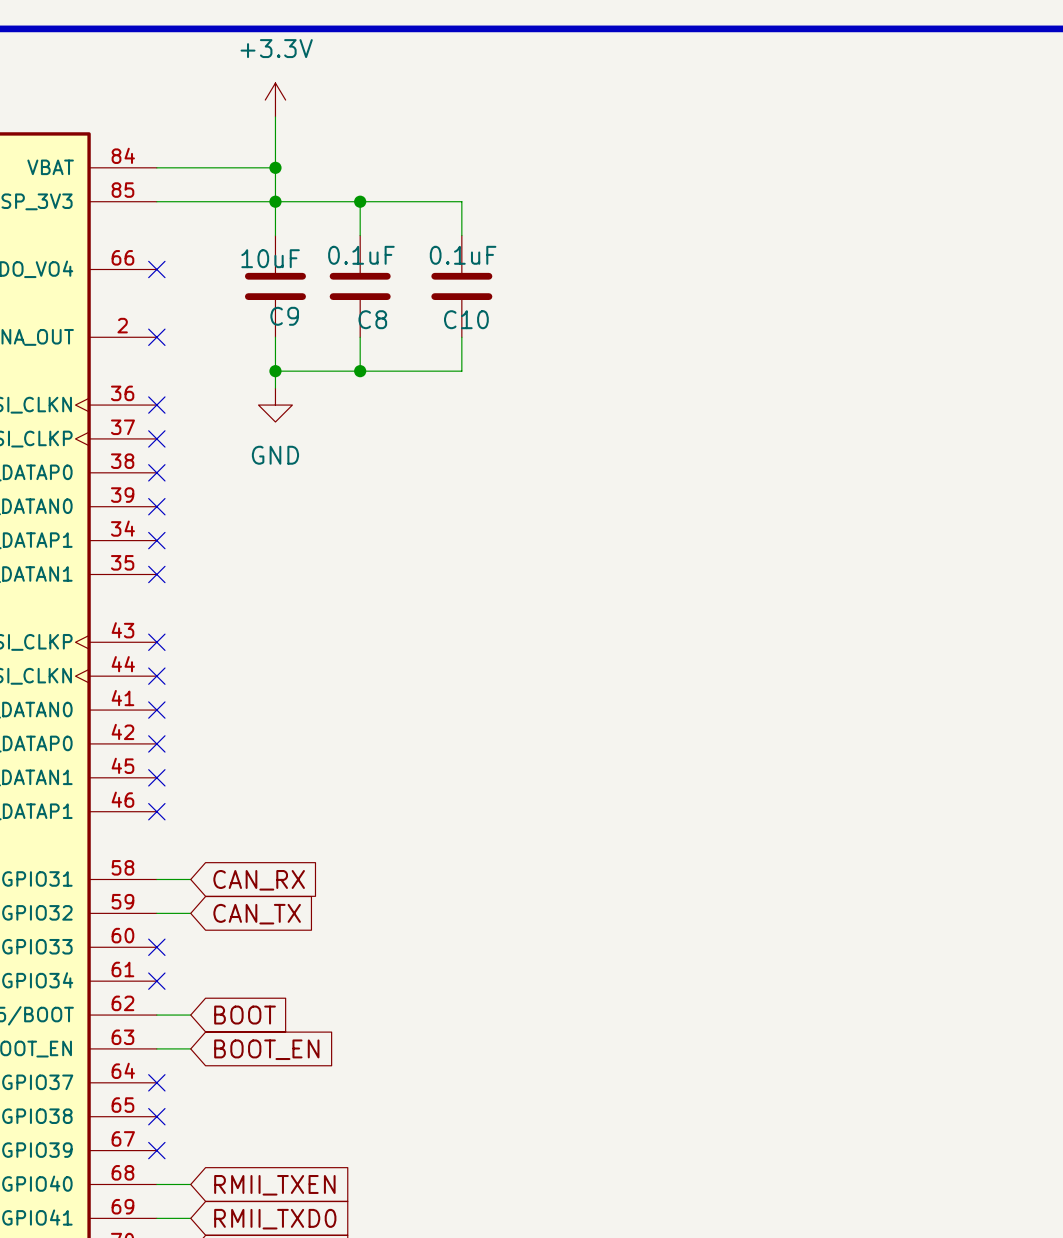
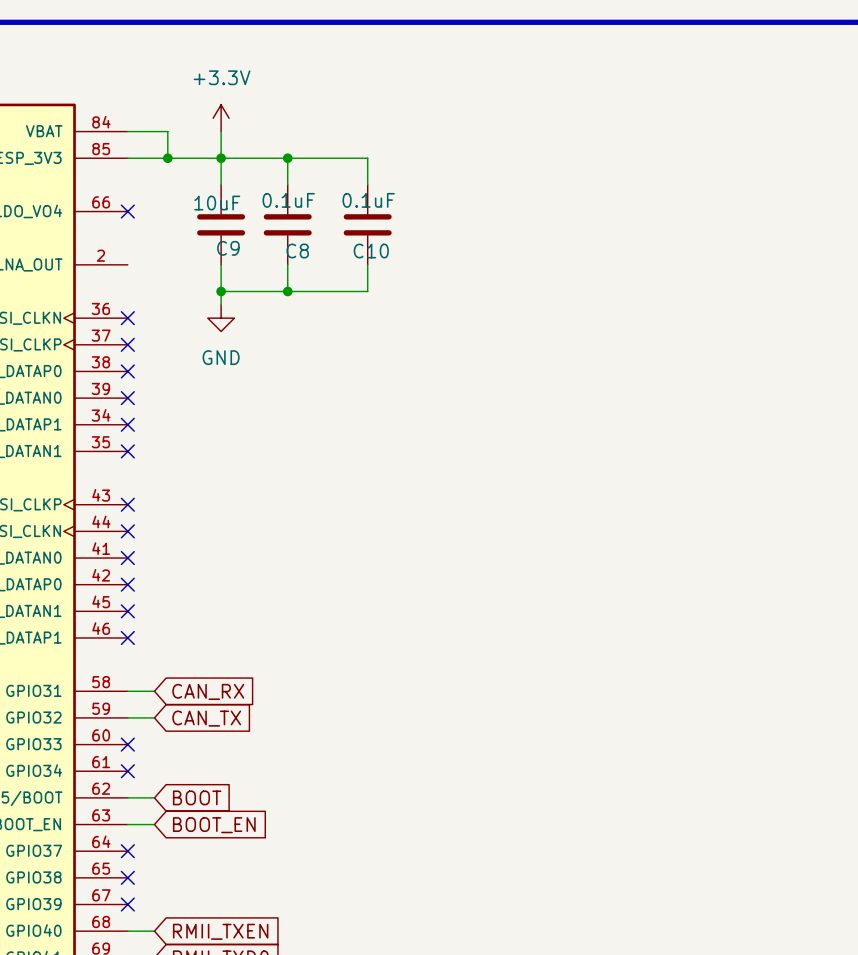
power symbol position: +3.3V (275, 100) -> +3.3V (221, 118)
wire: (275, 116) (275, 167) (207, 167) -> (167, 158) (167, 131)
junction position: (275, 167) -> (167, 158)
no-connect mark: (156, 337) -> none

